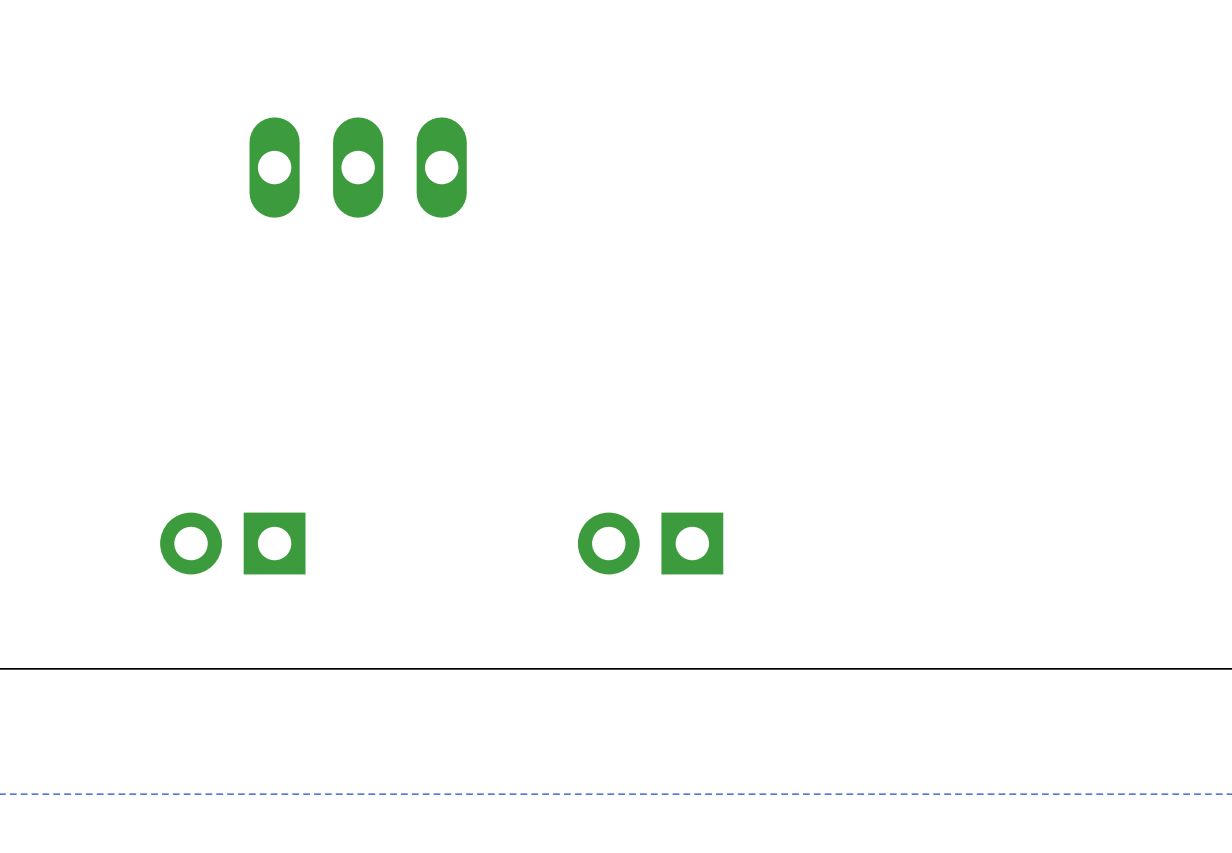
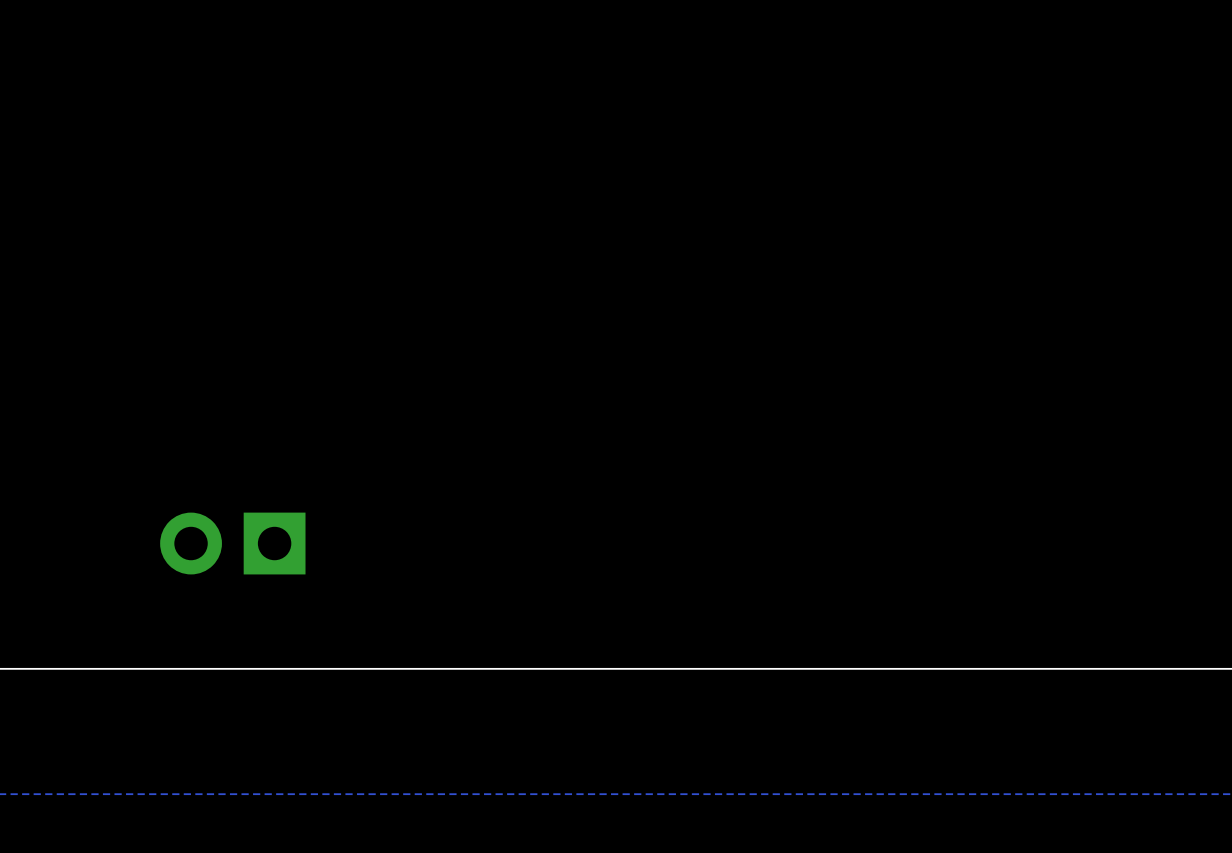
part: (358, 167) -> none
part: (650, 543) -> none

